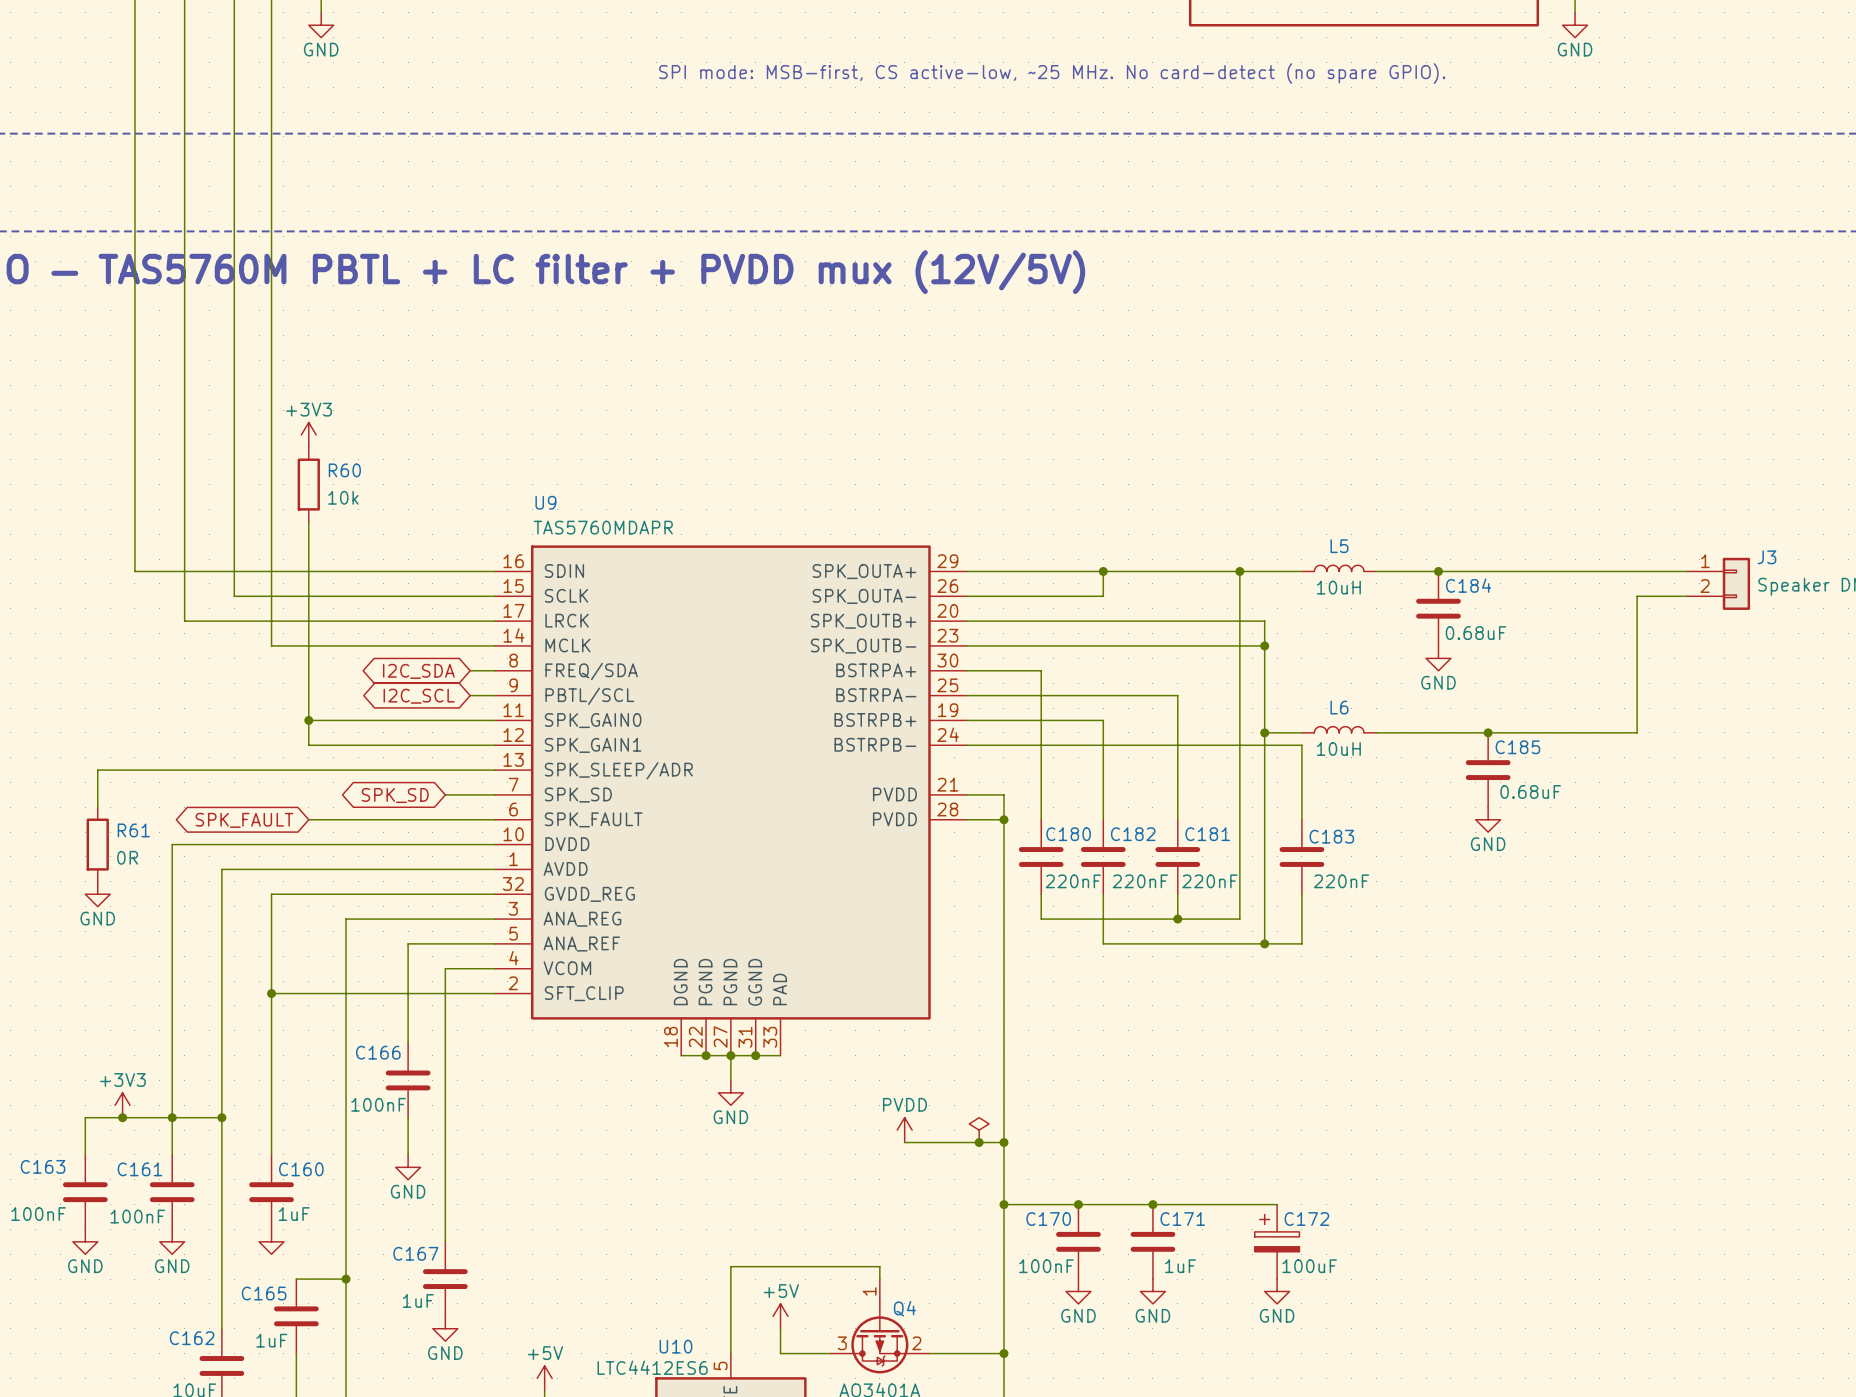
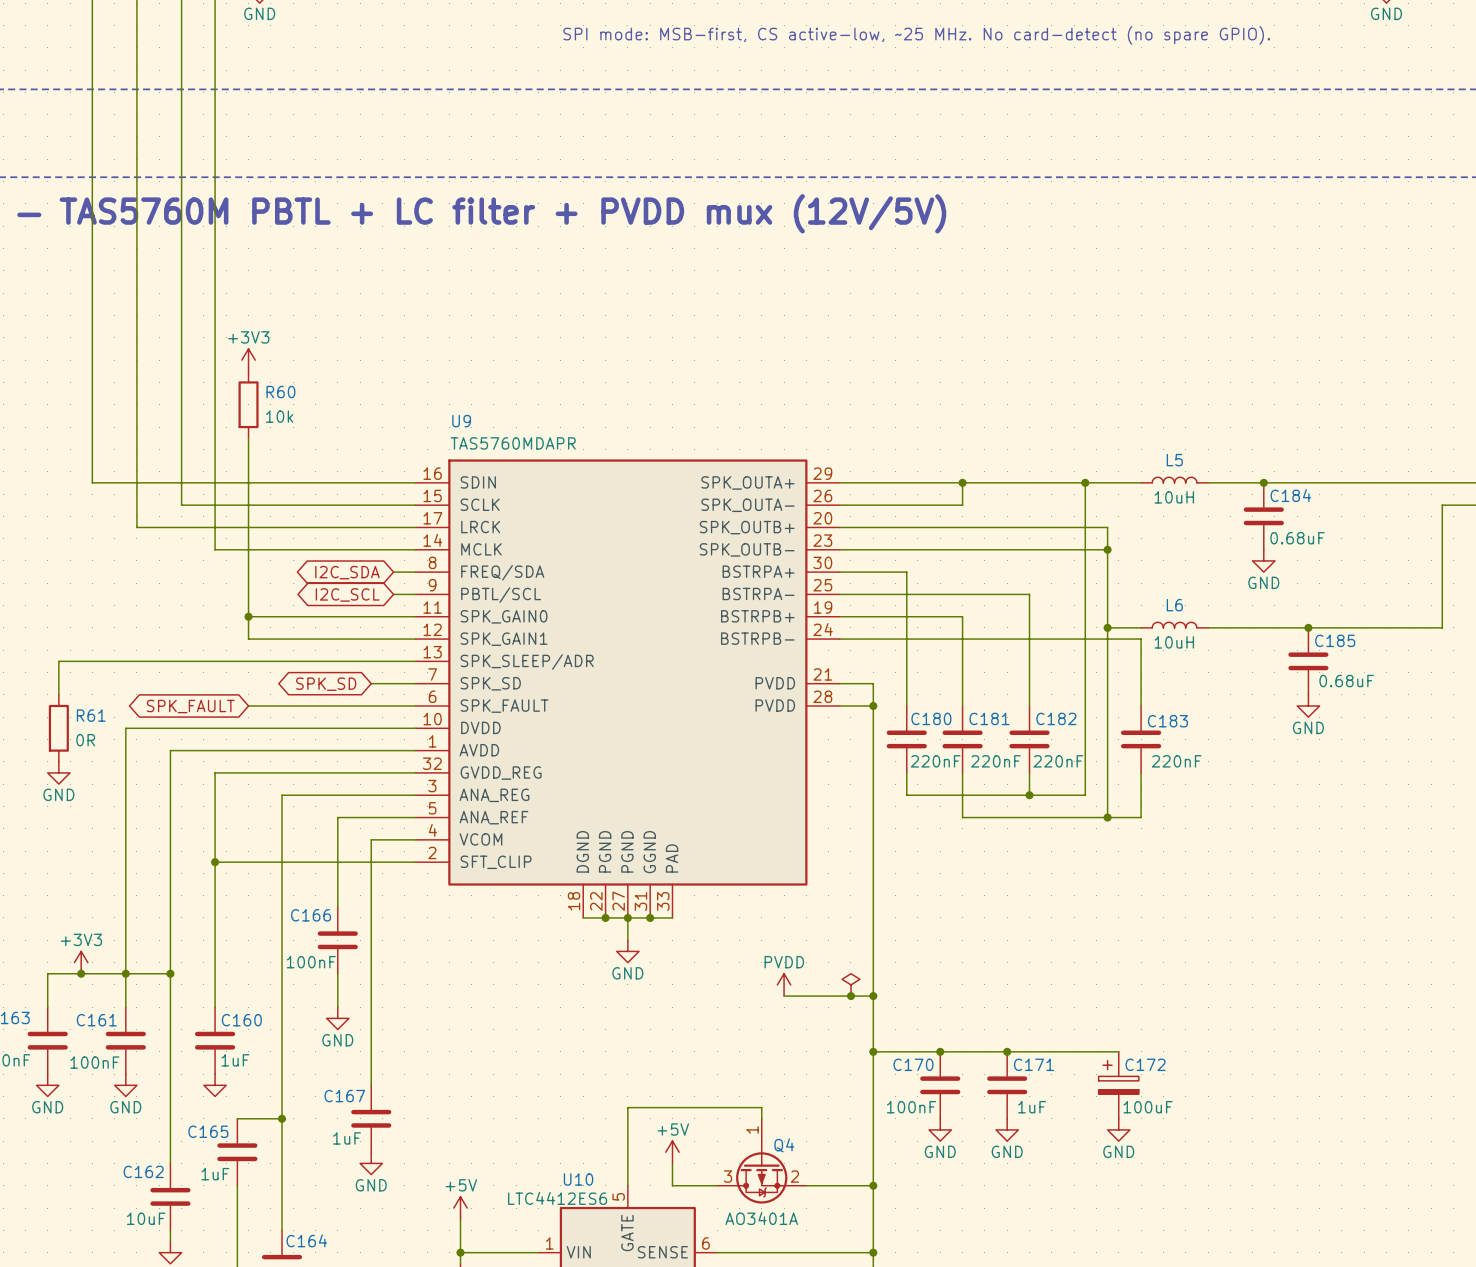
C182 name: C182 (1133, 834) -> C181 (989, 718)
C181 name: C181 (1207, 834) -> C182 (1056, 718)

